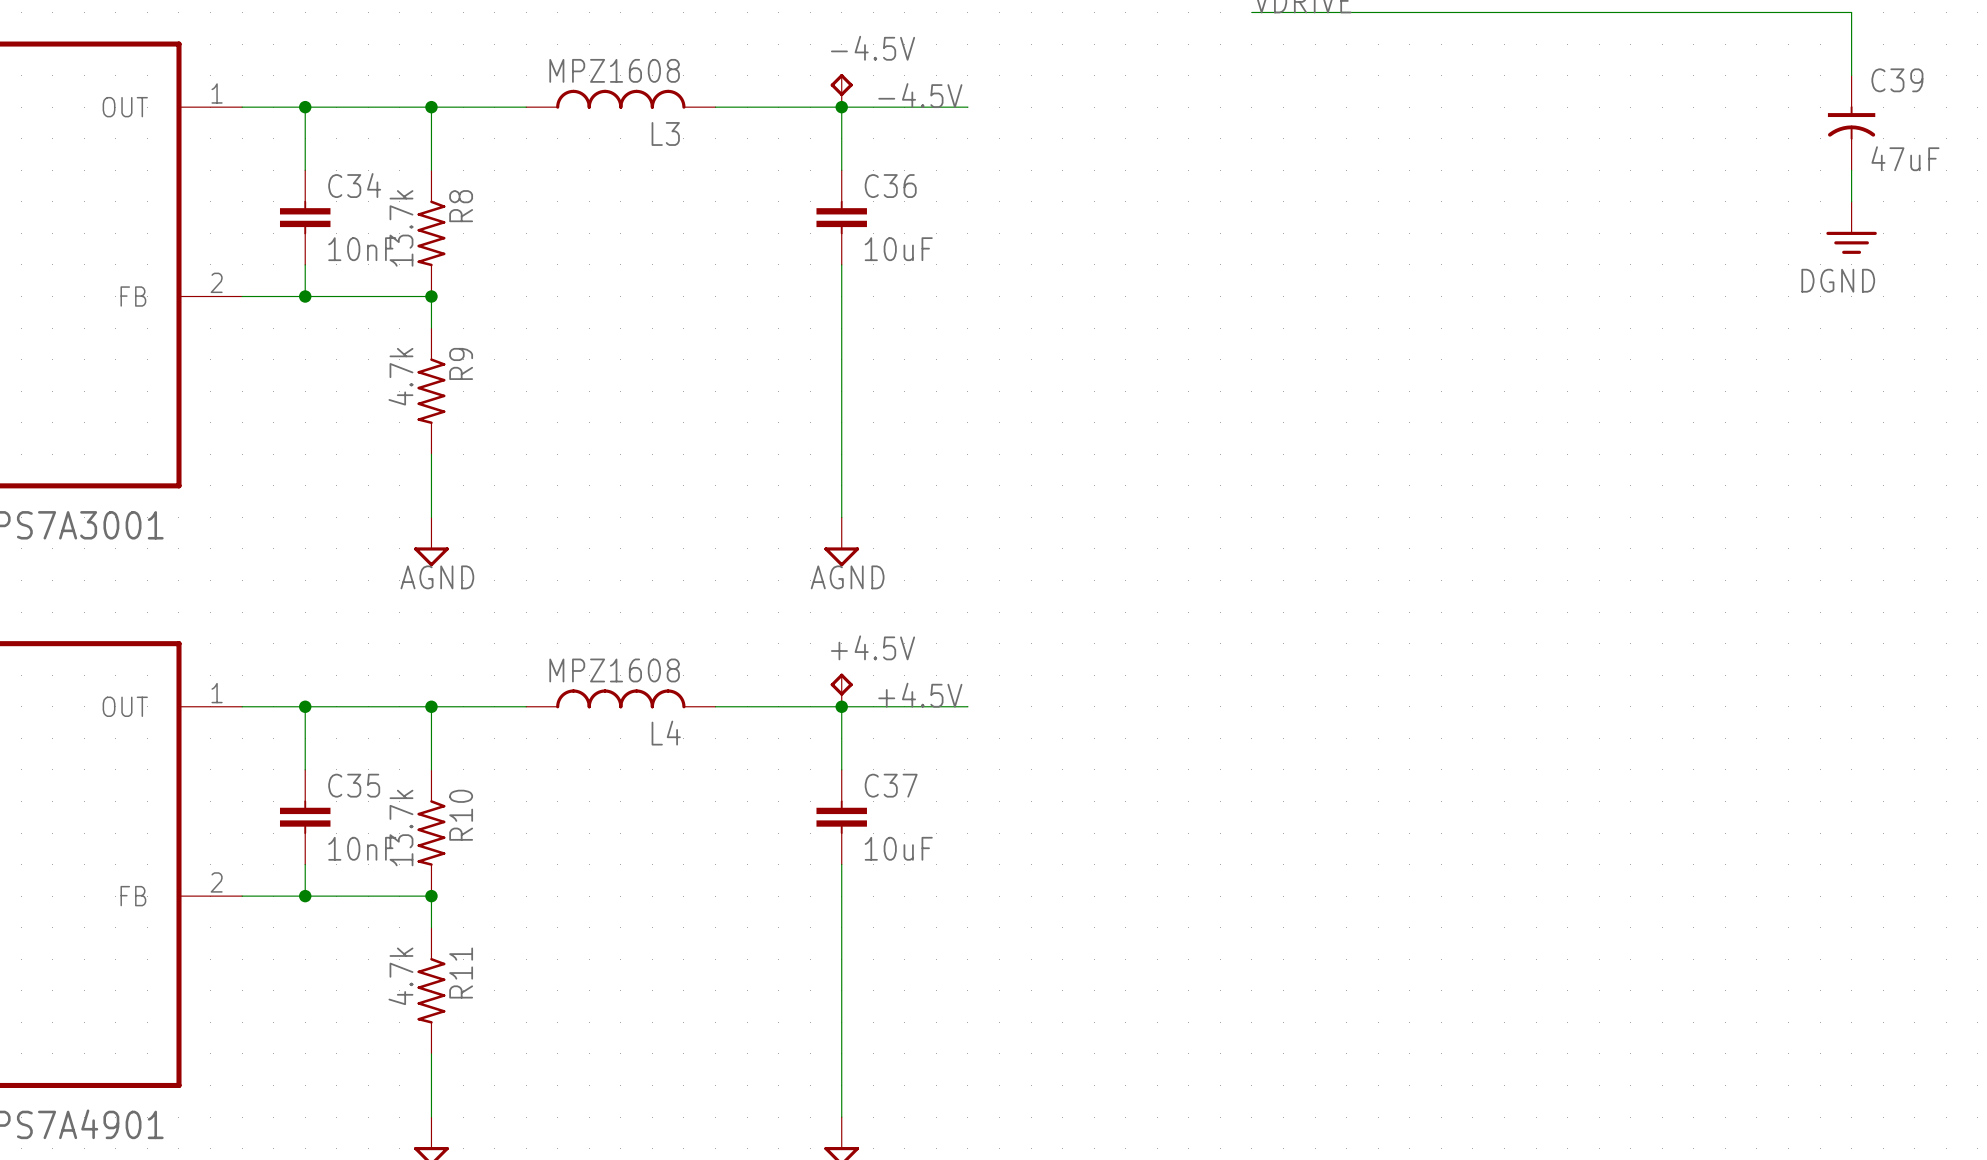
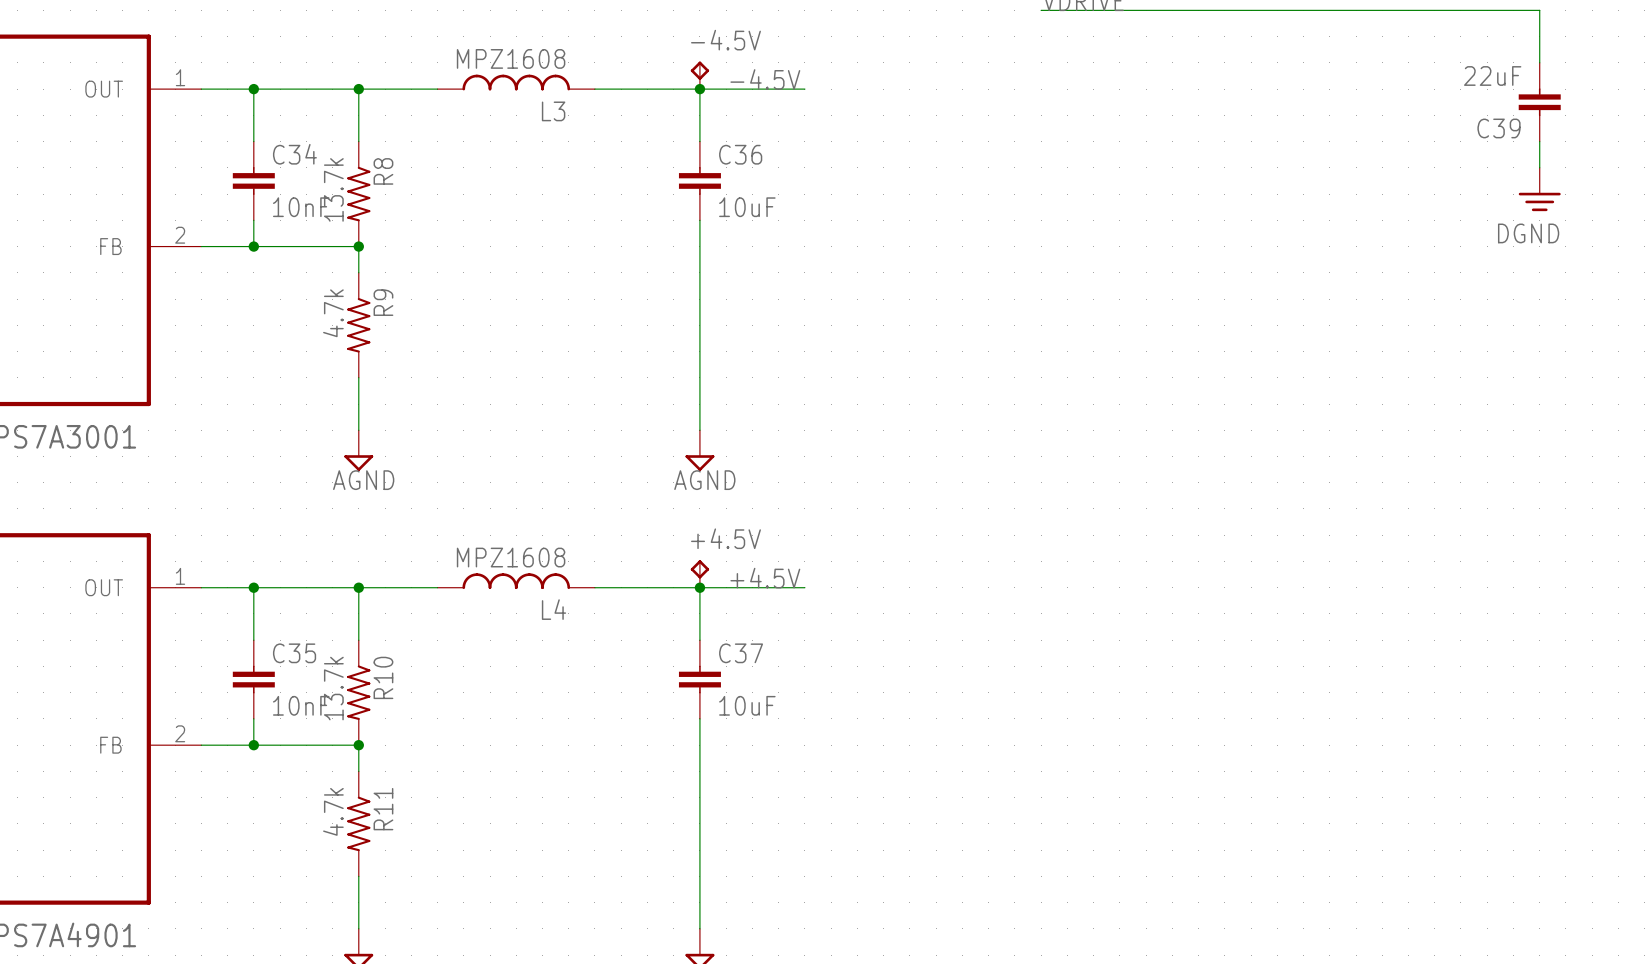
C39 symbol: [1827, 75, 1876, 171] -> [1518, 62, 1561, 142]
C39 name position: C39 (1897, 80) -> C39 (1498, 128)
C39 value: 47uF (1905, 158) -> 22uF (1492, 75)

